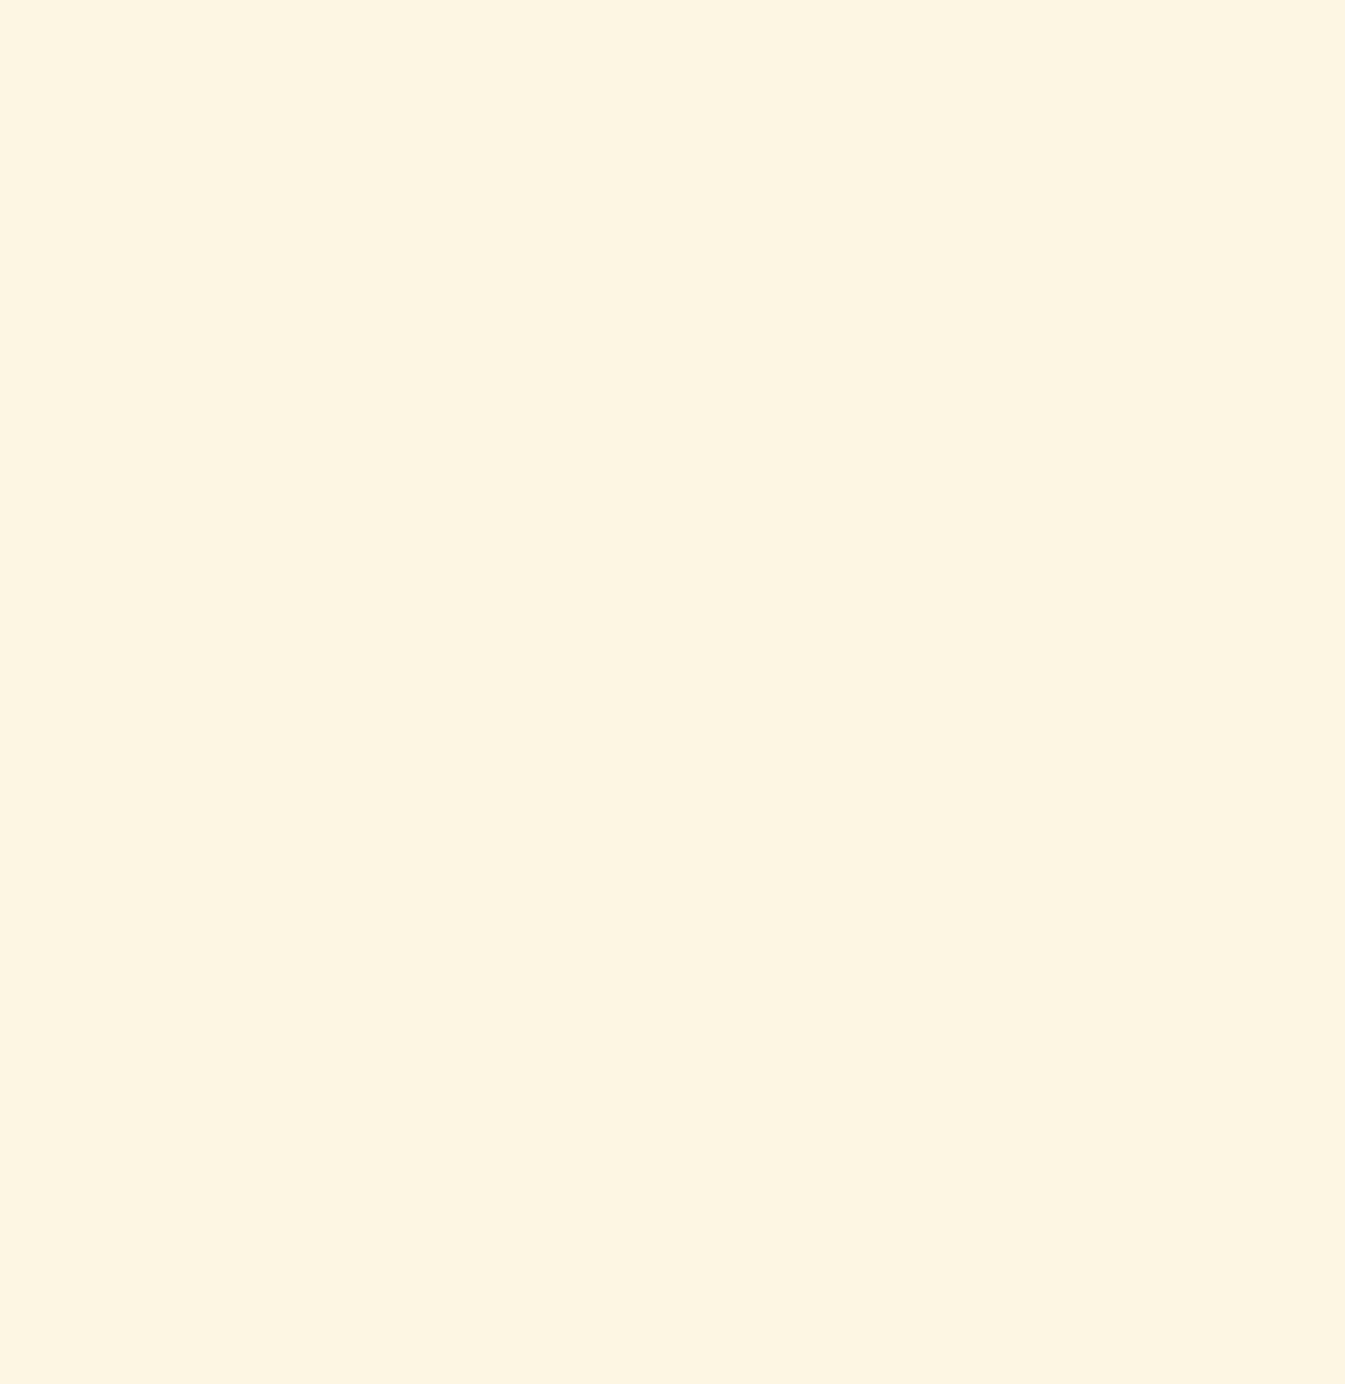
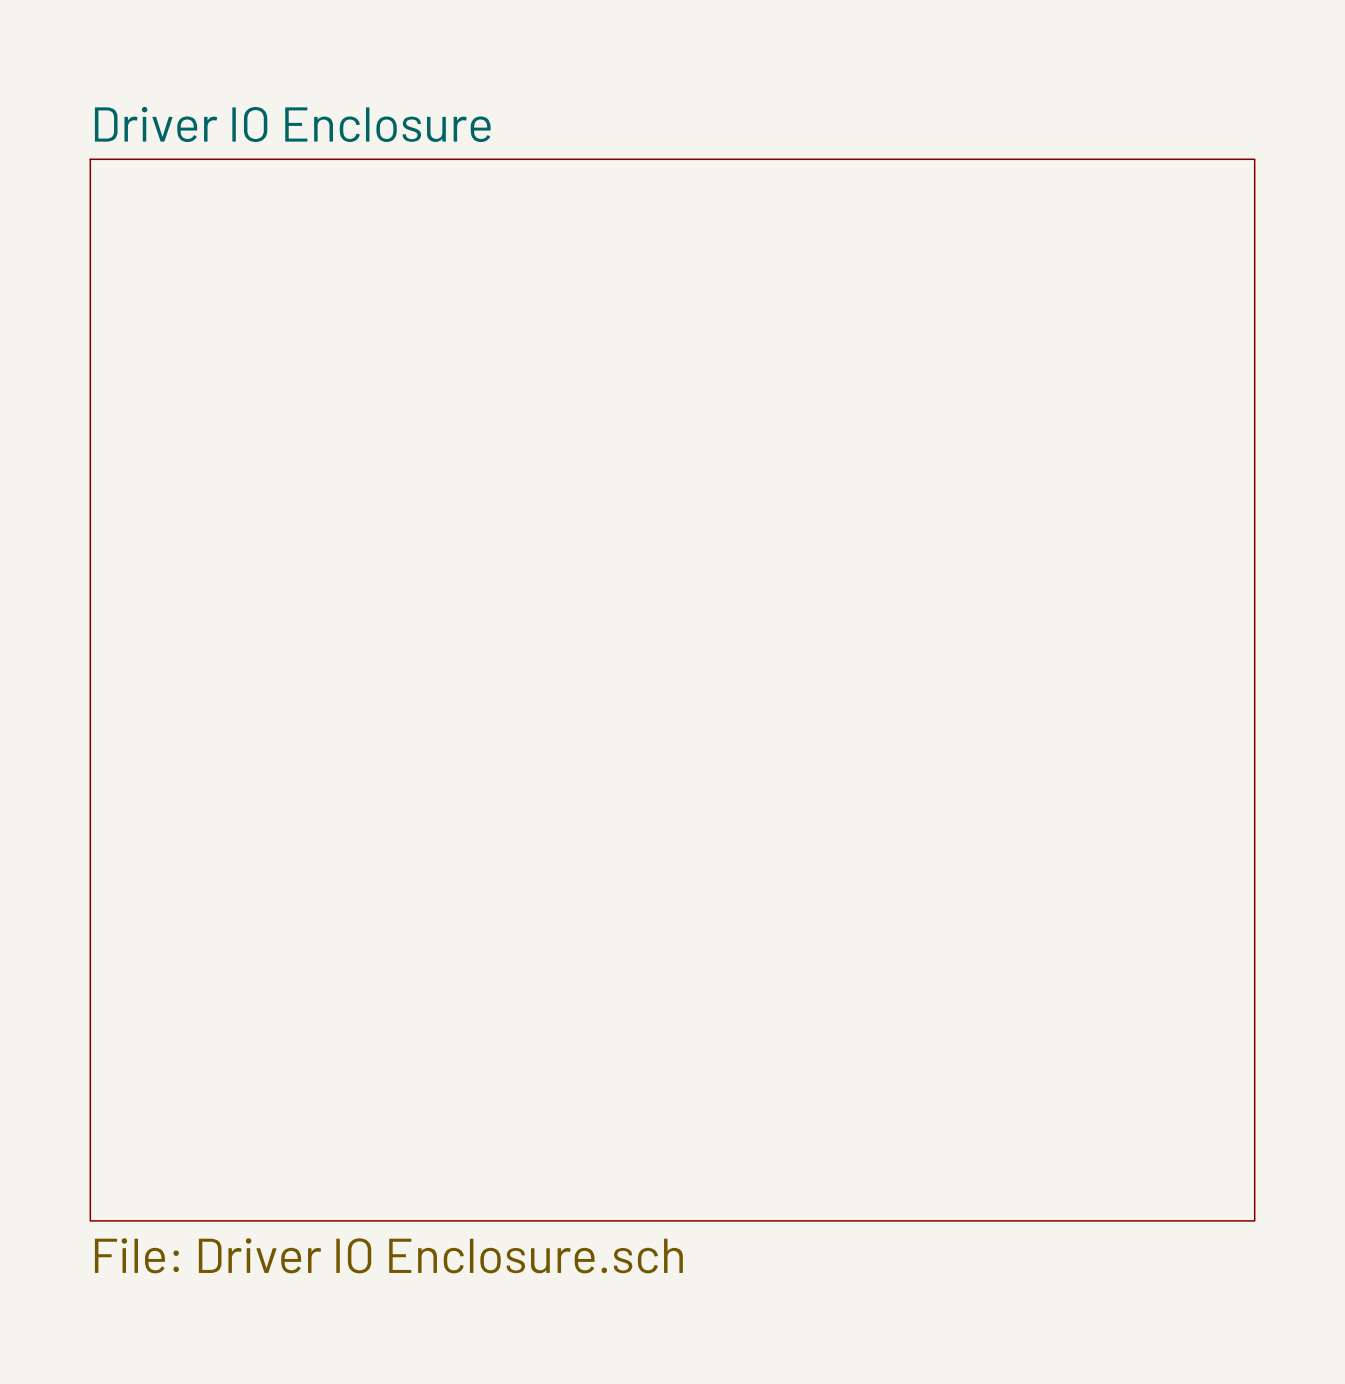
sheet Driver IO Enclosure: none -> File: Driver IO Enclosure.sch (672, 690)

